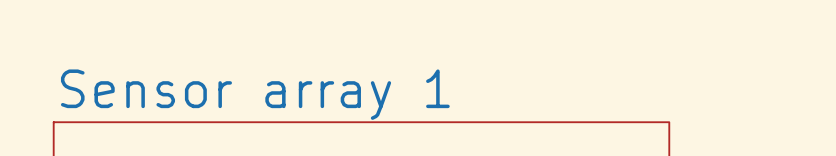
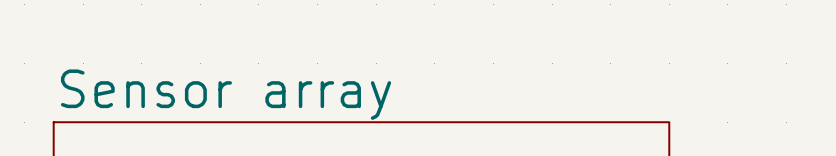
sheet Sensor array 1 name: Sensor array 1 (255, 94) -> Sensor array (226, 94)

